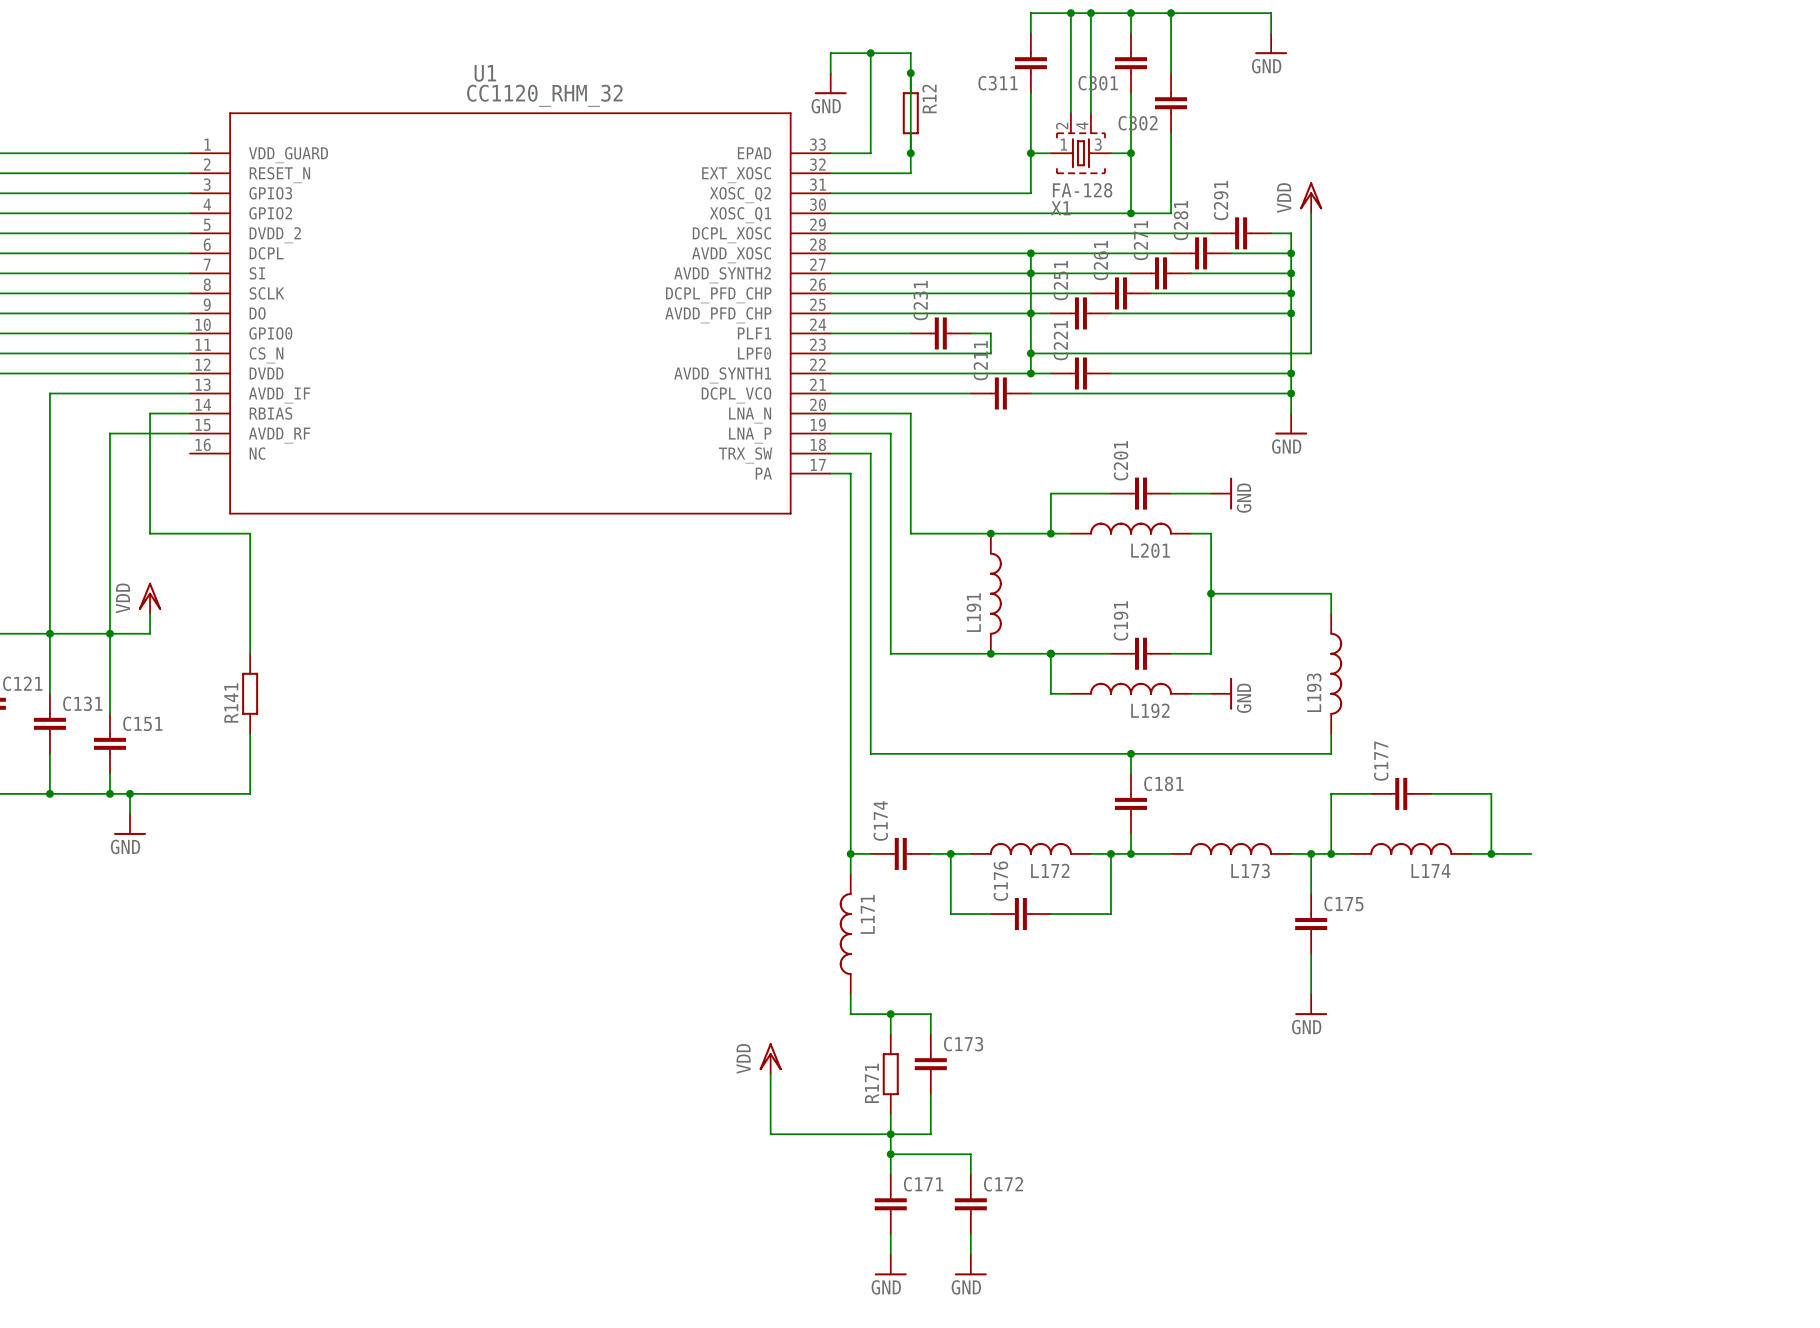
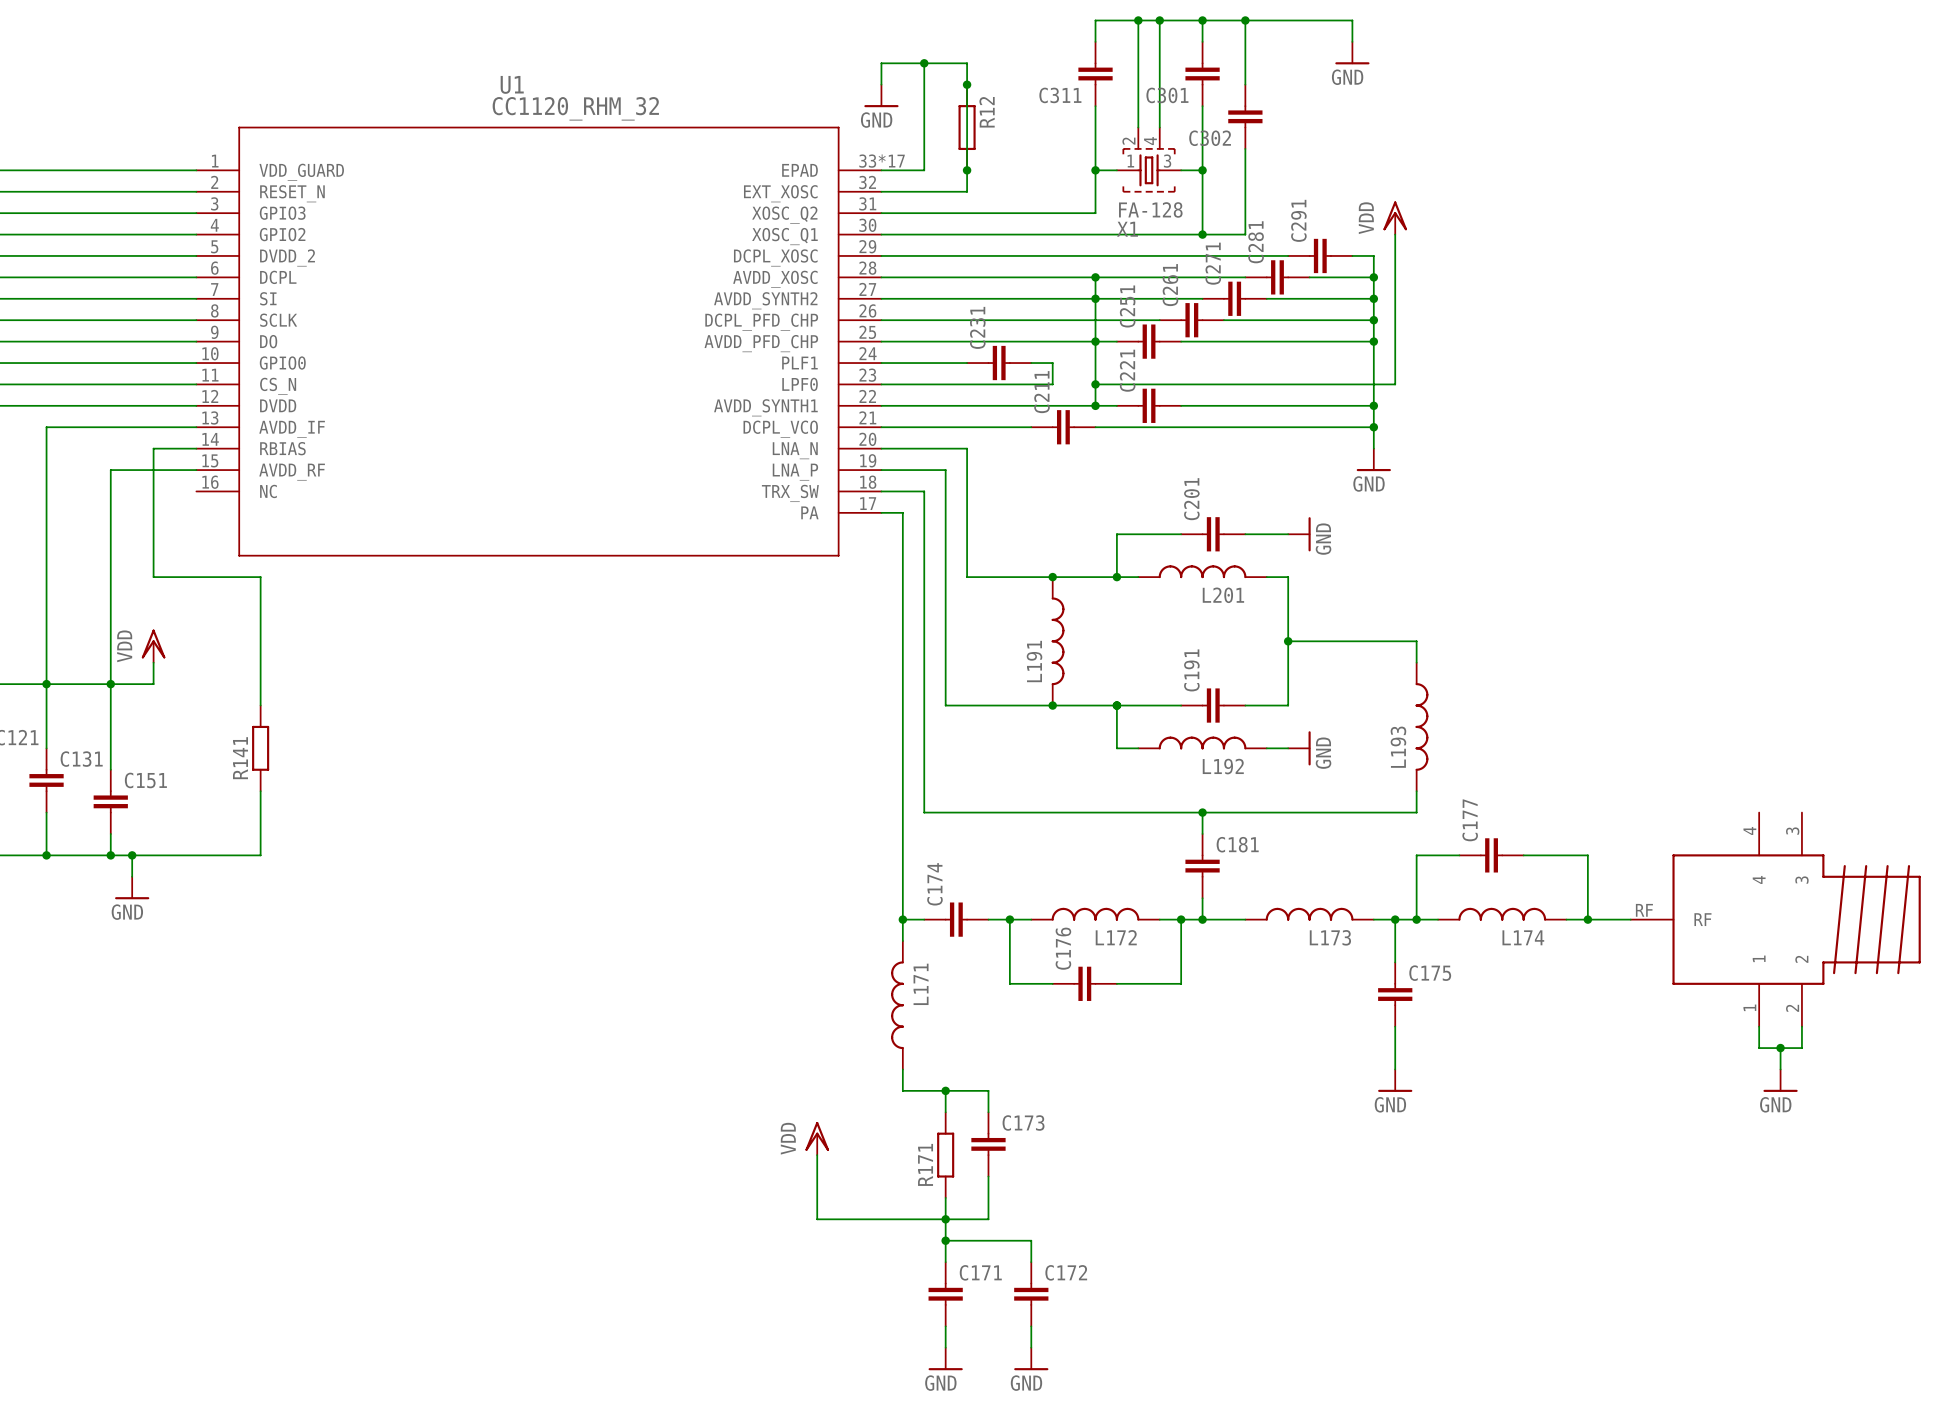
U1 pin number: 33 (817, 144) -> 33*17 (882, 161)
part: none -> (1775, 919)
wire: none -> (1759, 1026) (1759, 1048) (1801, 1048) (1801, 1026)
wire: none -> (1780, 1048) (1780, 1069)
junction: none -> (1780, 1048)
power symbol: none -> GND (1780, 1080)

